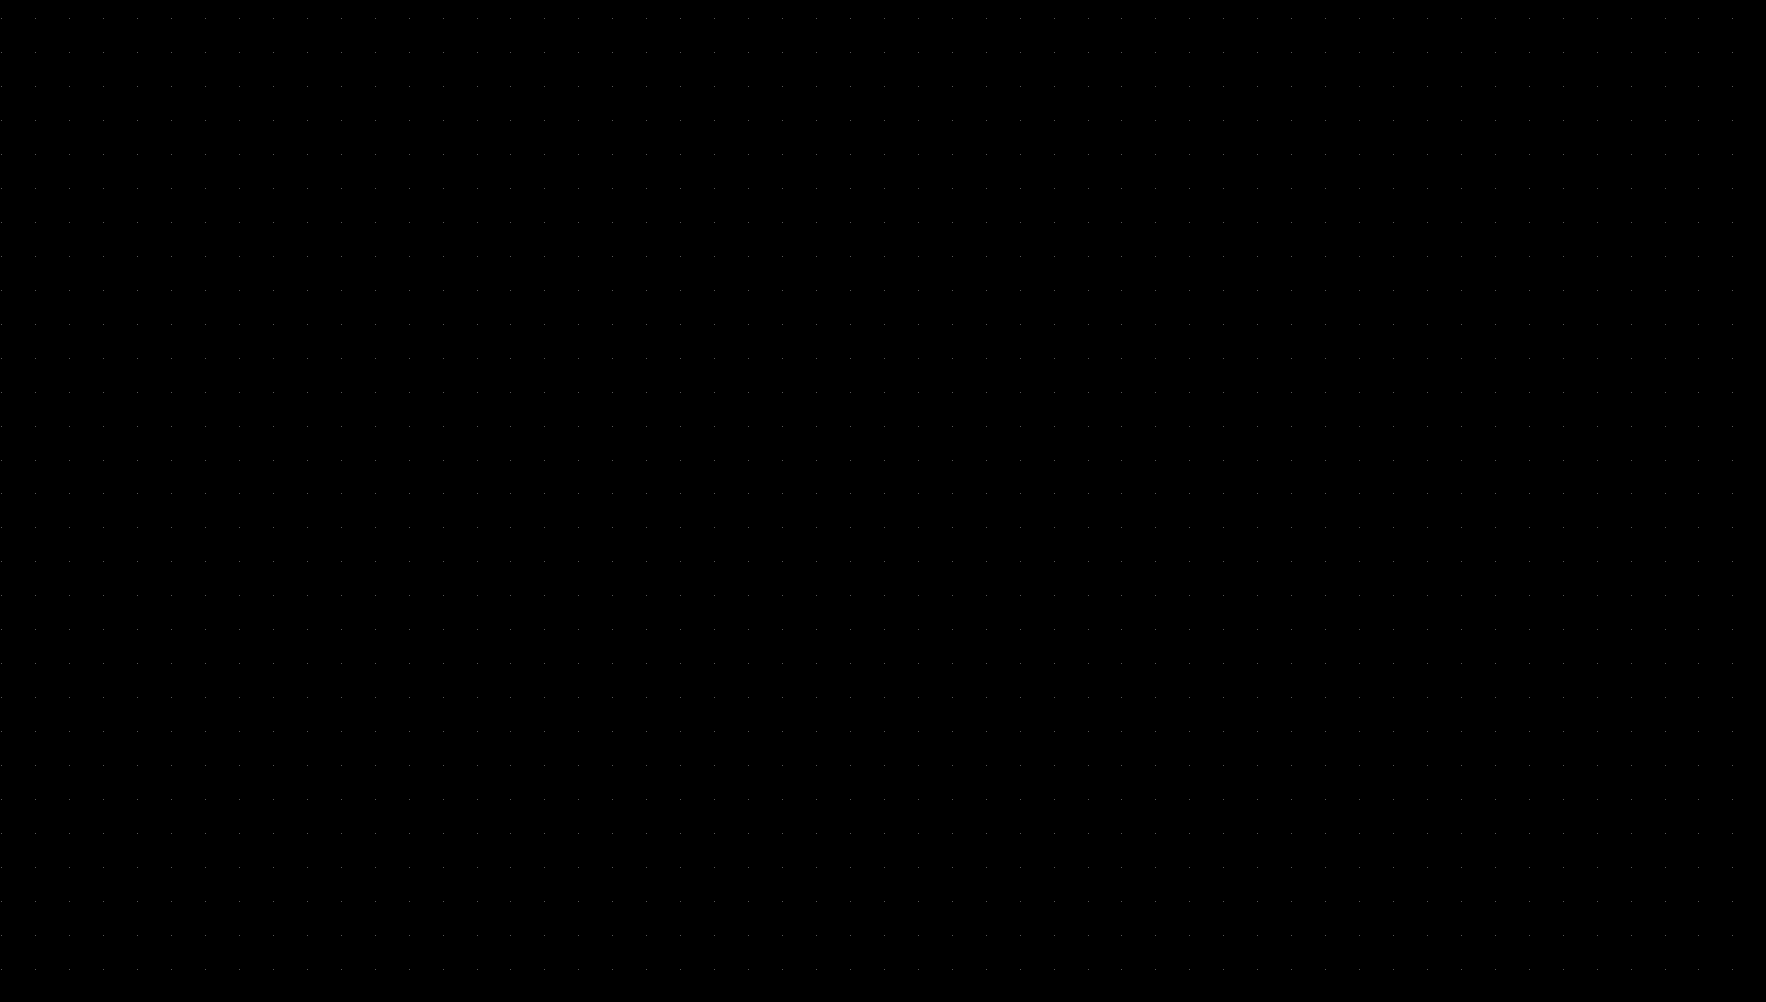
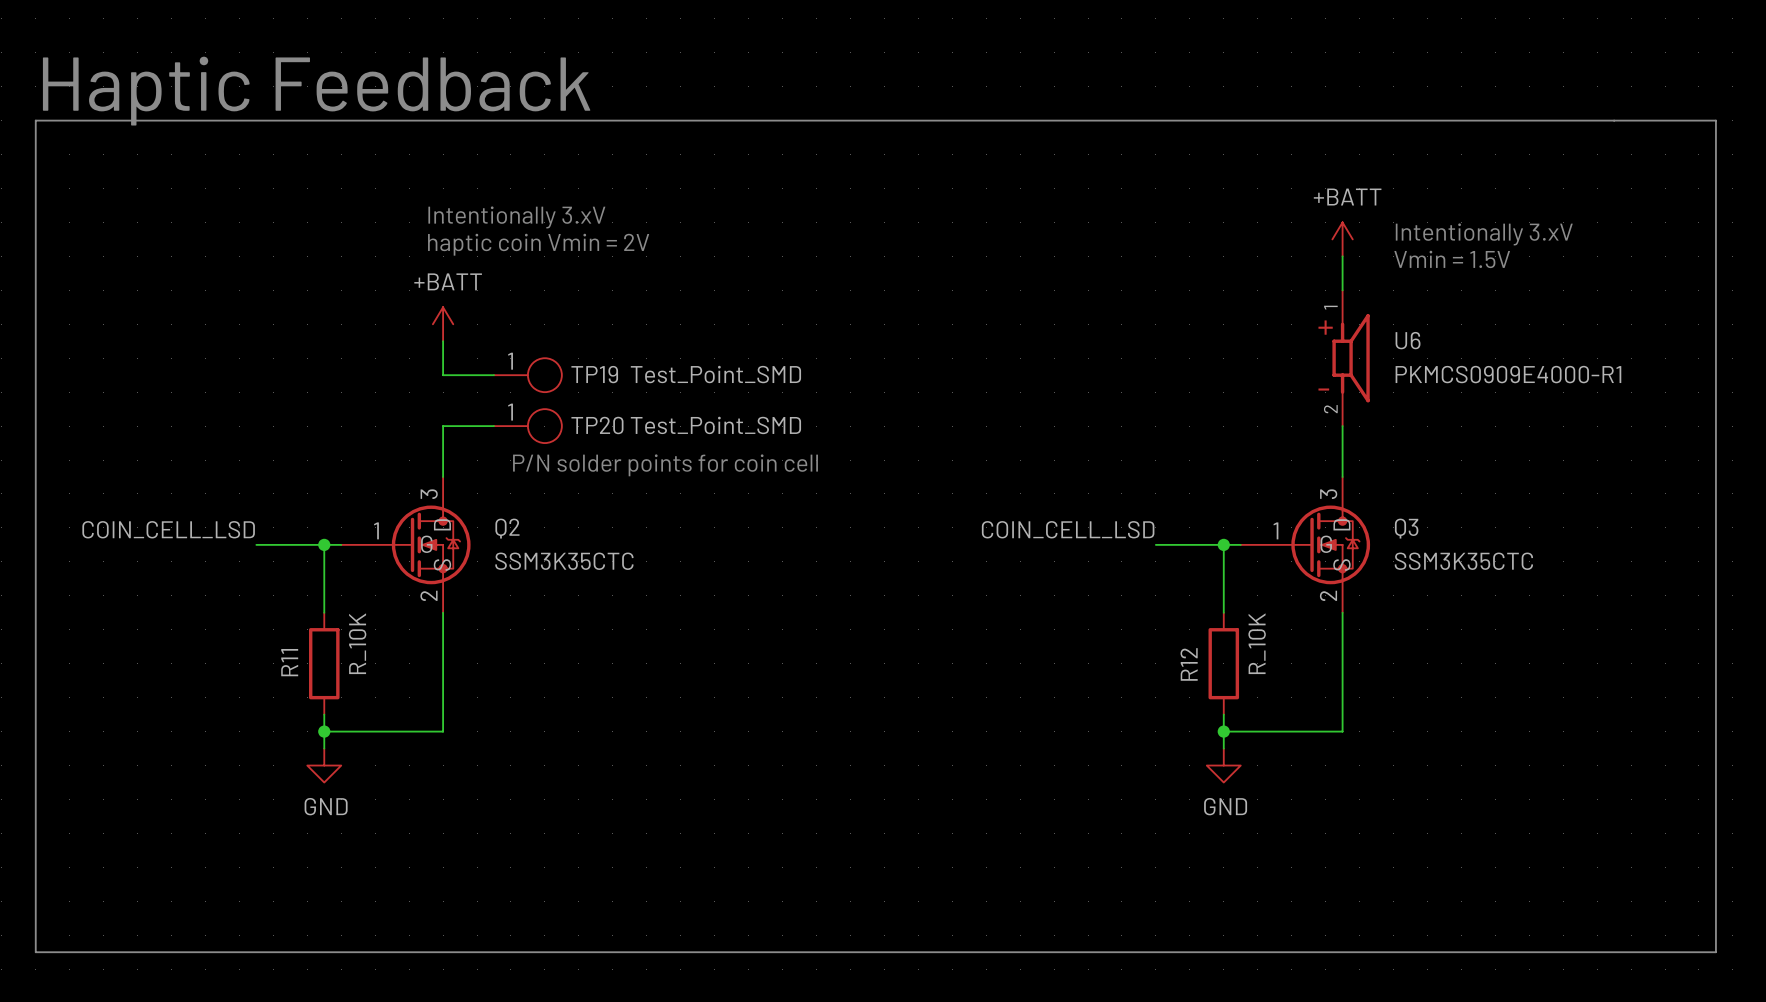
text: none -> Haptic Feedback (316, 91)
line: none -> (35, 120) (1715, 120) (1715, 952) (35, 952) (35, 120)
text: none -> Intentionally 3.xV (516, 217)
text: none -> Intentionally 3.xV (1484, 234)
power symbol: none -> +BATT (1342, 239)
text: none -> haptic coin Vmin = 2V (538, 244)
wire: none -> (1342, 256) (1342, 290)
text: none -> Vmin = 1.5V (1452, 259)
power symbol: none -> +BATT (443, 324)
wire: none -> (443, 341) (443, 375) (493, 375)
U6: none -> PKMCS0909E4000-R1 (1351, 358)
TP19: none -> Test_Point_SMD (527, 375)
wire: none -> (493, 426) (443, 426) (443, 477)
TP20: none -> Test_Point_SMD (527, 426)
wire: none -> (1342, 426) (1342, 477)
text: none -> P/N solder points for coin cell (665, 465)
label: none -> COIN_CELL_LSD (168, 529)
label: none -> COIN_CELL_LSD (1068, 529)
wire: none -> (256, 544) (341, 544)
wire: none -> (324, 544) (324, 612)
junction: none -> (324, 544)
Q2: none -> SSM3K35CTC (405, 544)
wire: none -> (1155, 544) (1240, 544)
wire: none -> (1223, 544) (1223, 612)
junction: none -> (1223, 544)
Q3: none -> SSM3K35CTC (1305, 544)
wire: none -> (443, 612) (443, 731) (324, 731)
wire: none -> (1342, 612) (1342, 731) (1223, 731)
R11: none -> R_10K (324, 663)
R12: none -> R_10K (1223, 663)
wire: none -> (324, 714) (324, 748)
wire: none -> (1223, 714) (1223, 748)
junction: none -> (324, 731)
junction: none -> (1223, 731)
power symbol: none -> GND (324, 765)
power symbol: none -> GND (1223, 765)

